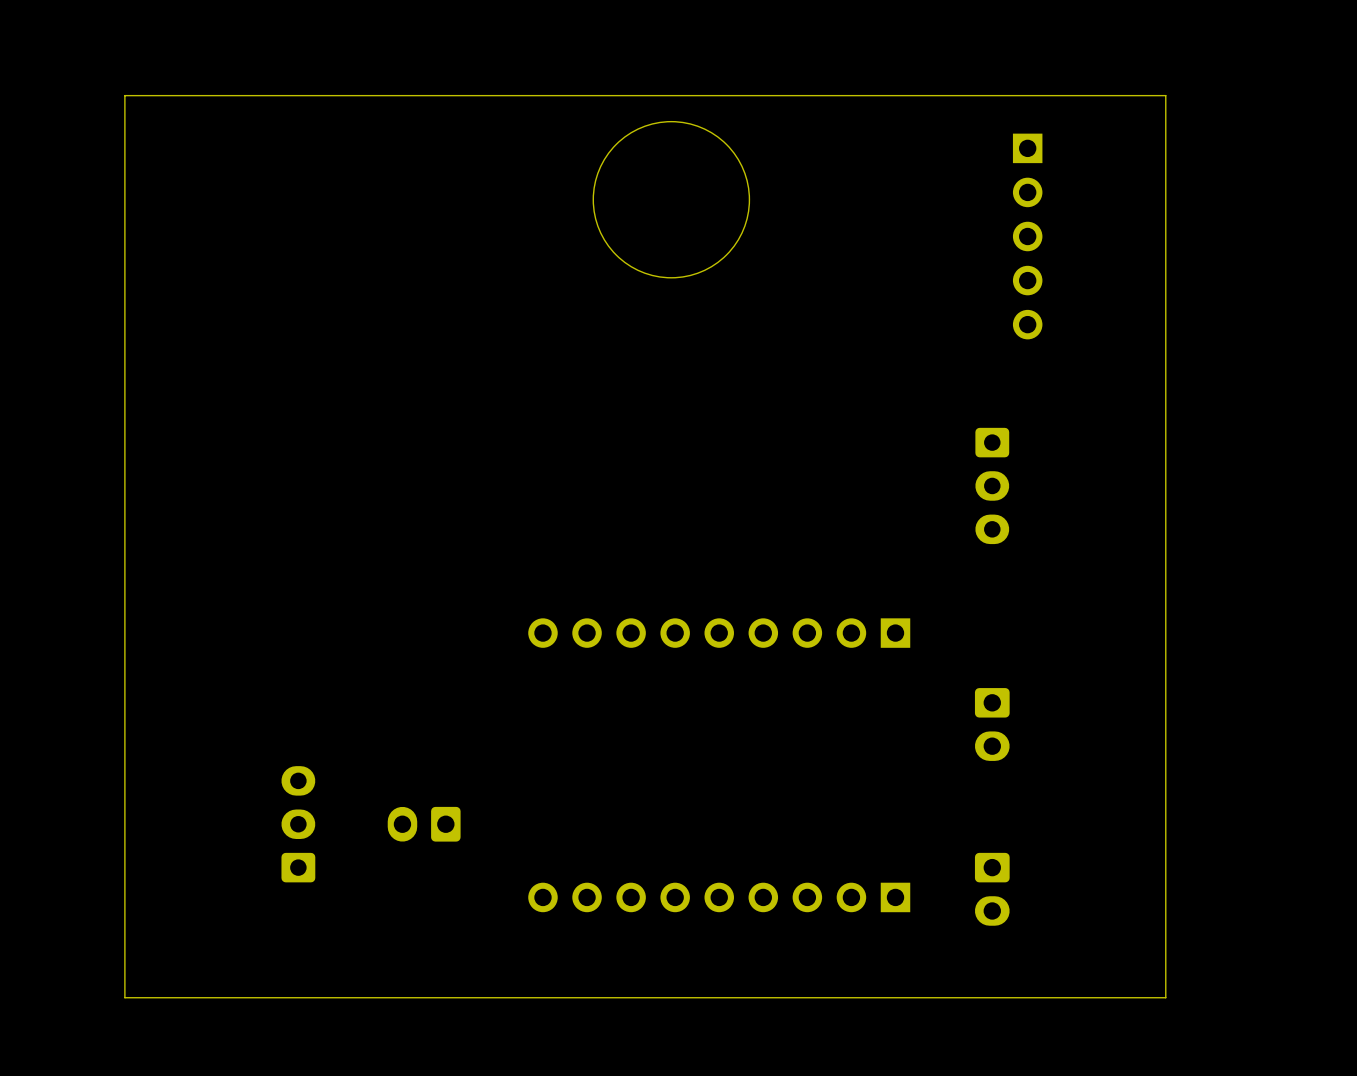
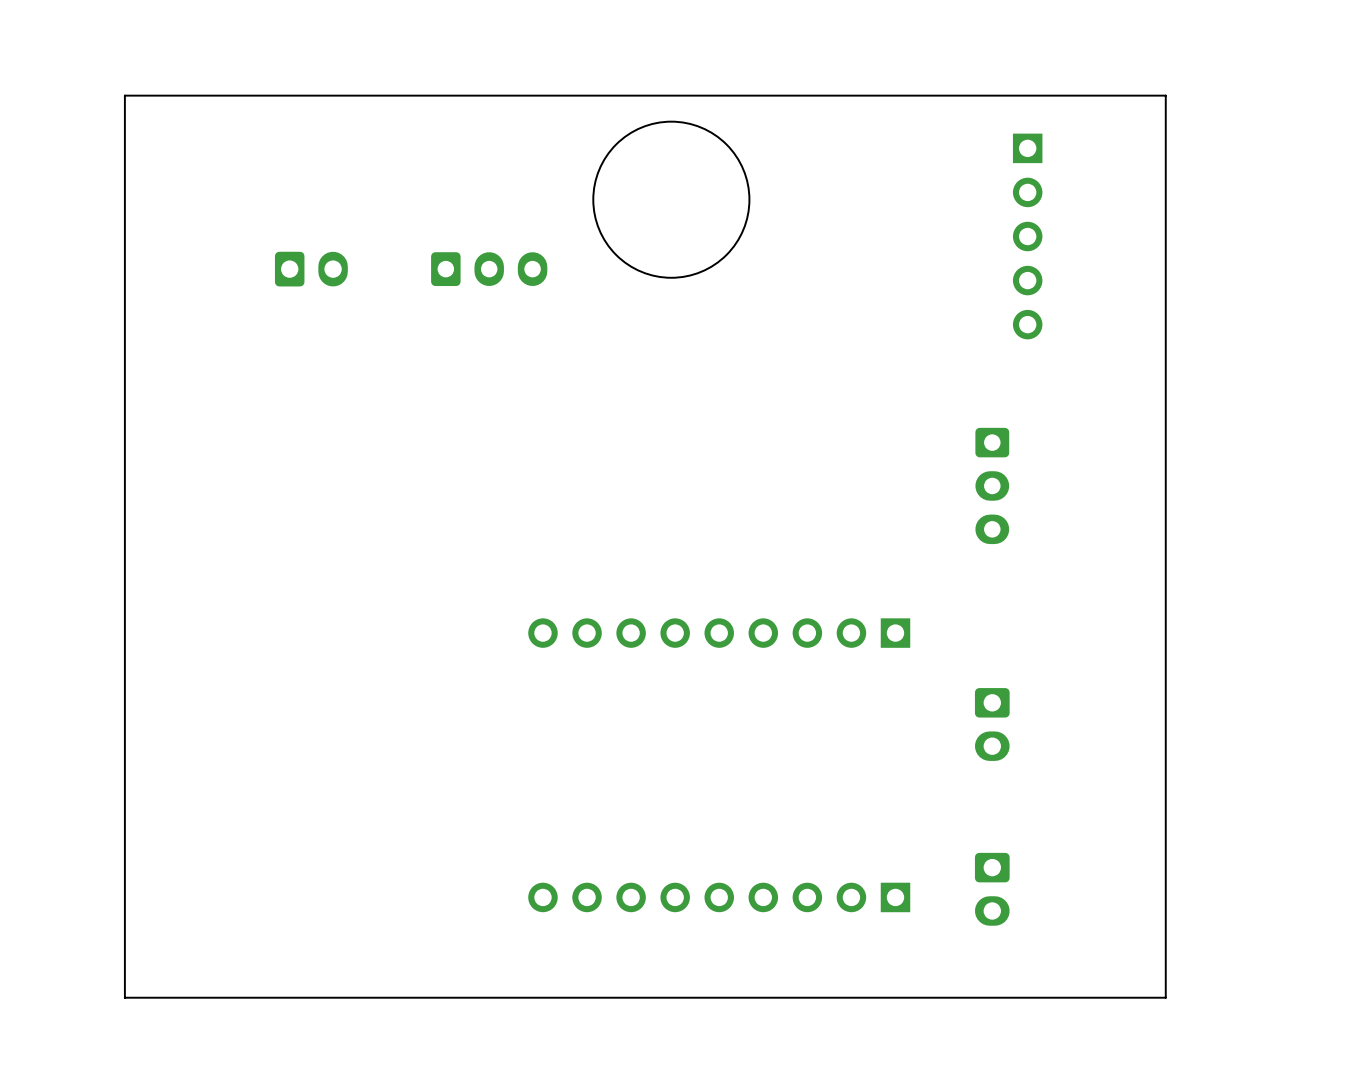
part: none -> (311, 269)
part: none -> (489, 269)
part: (298, 824) -> none
part: (424, 824) -> none

